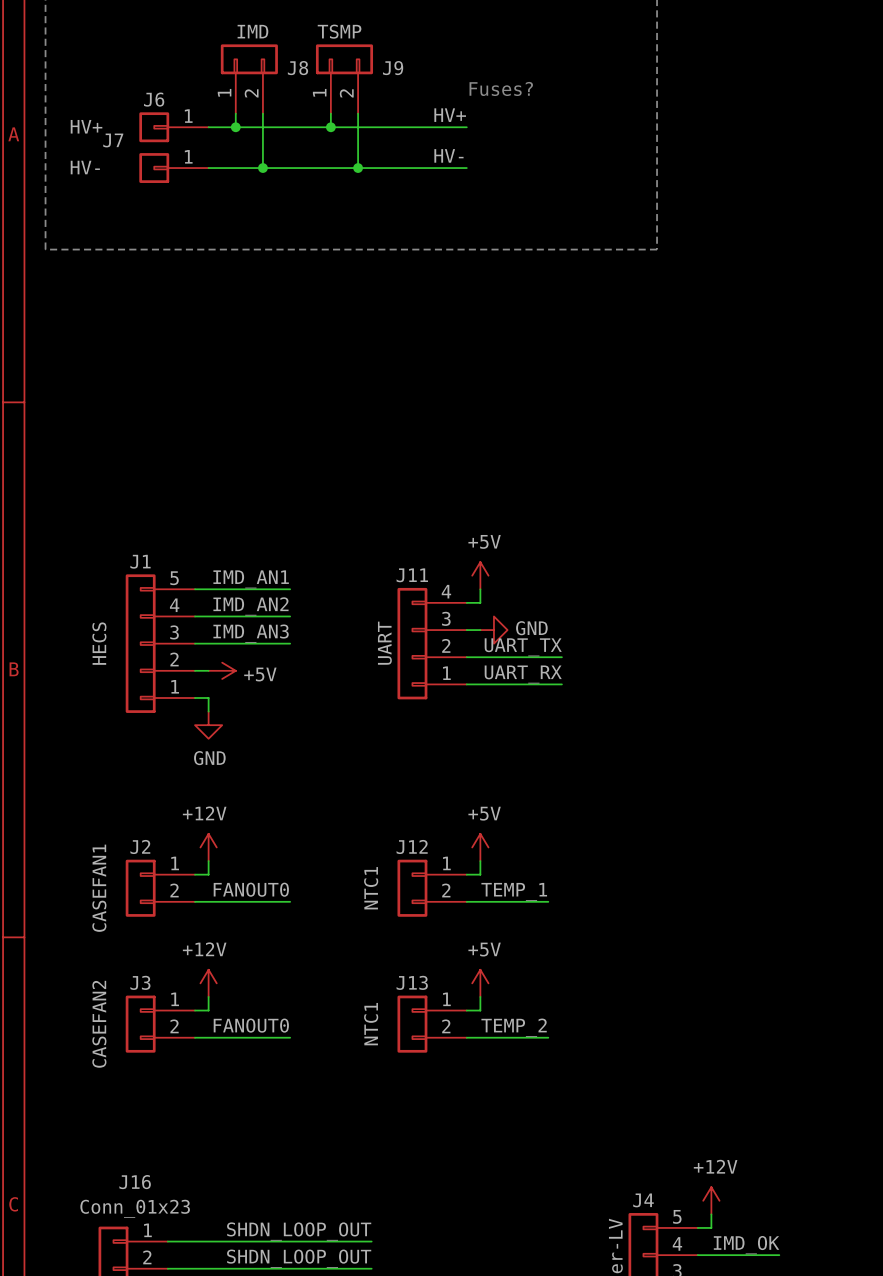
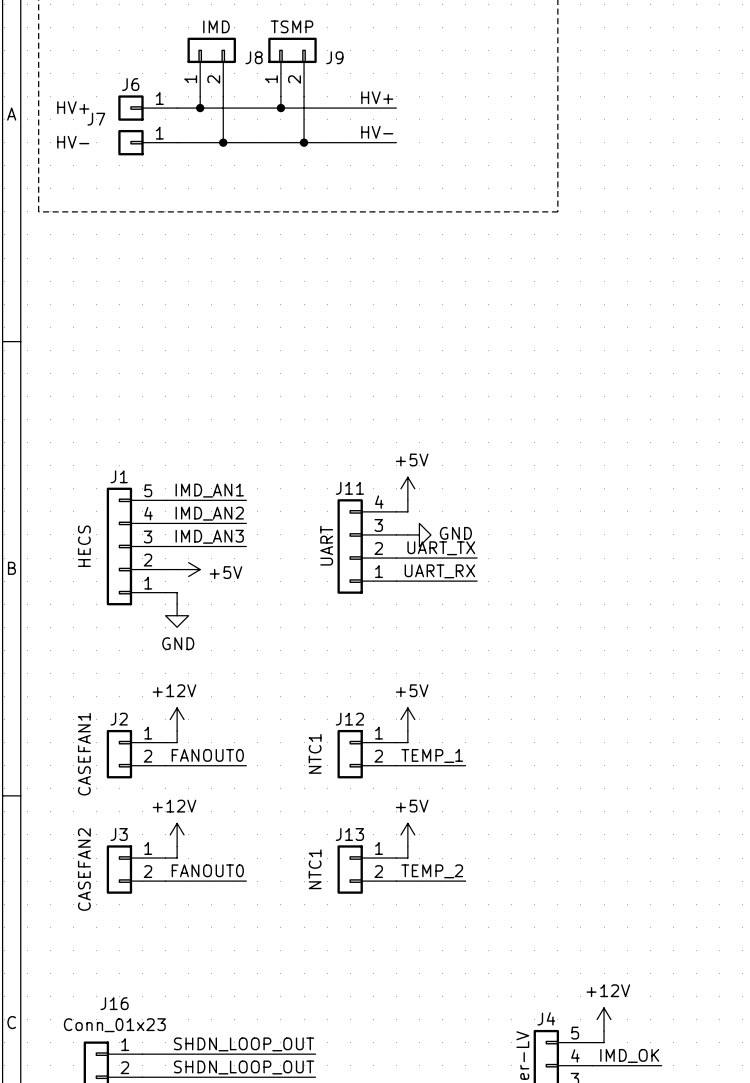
text: Fuses? (501, 88) -> none

